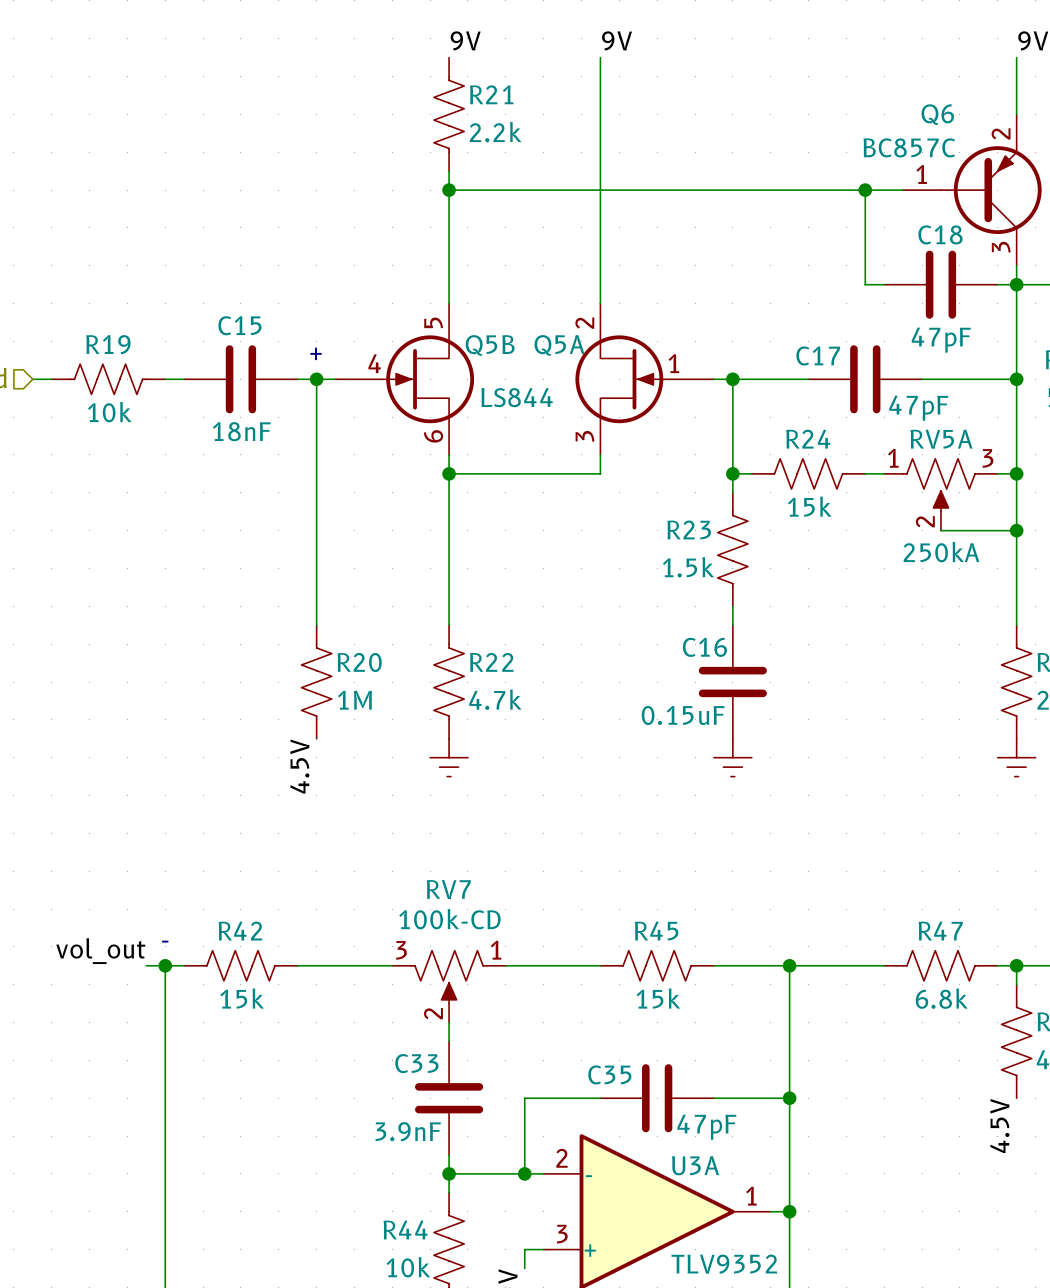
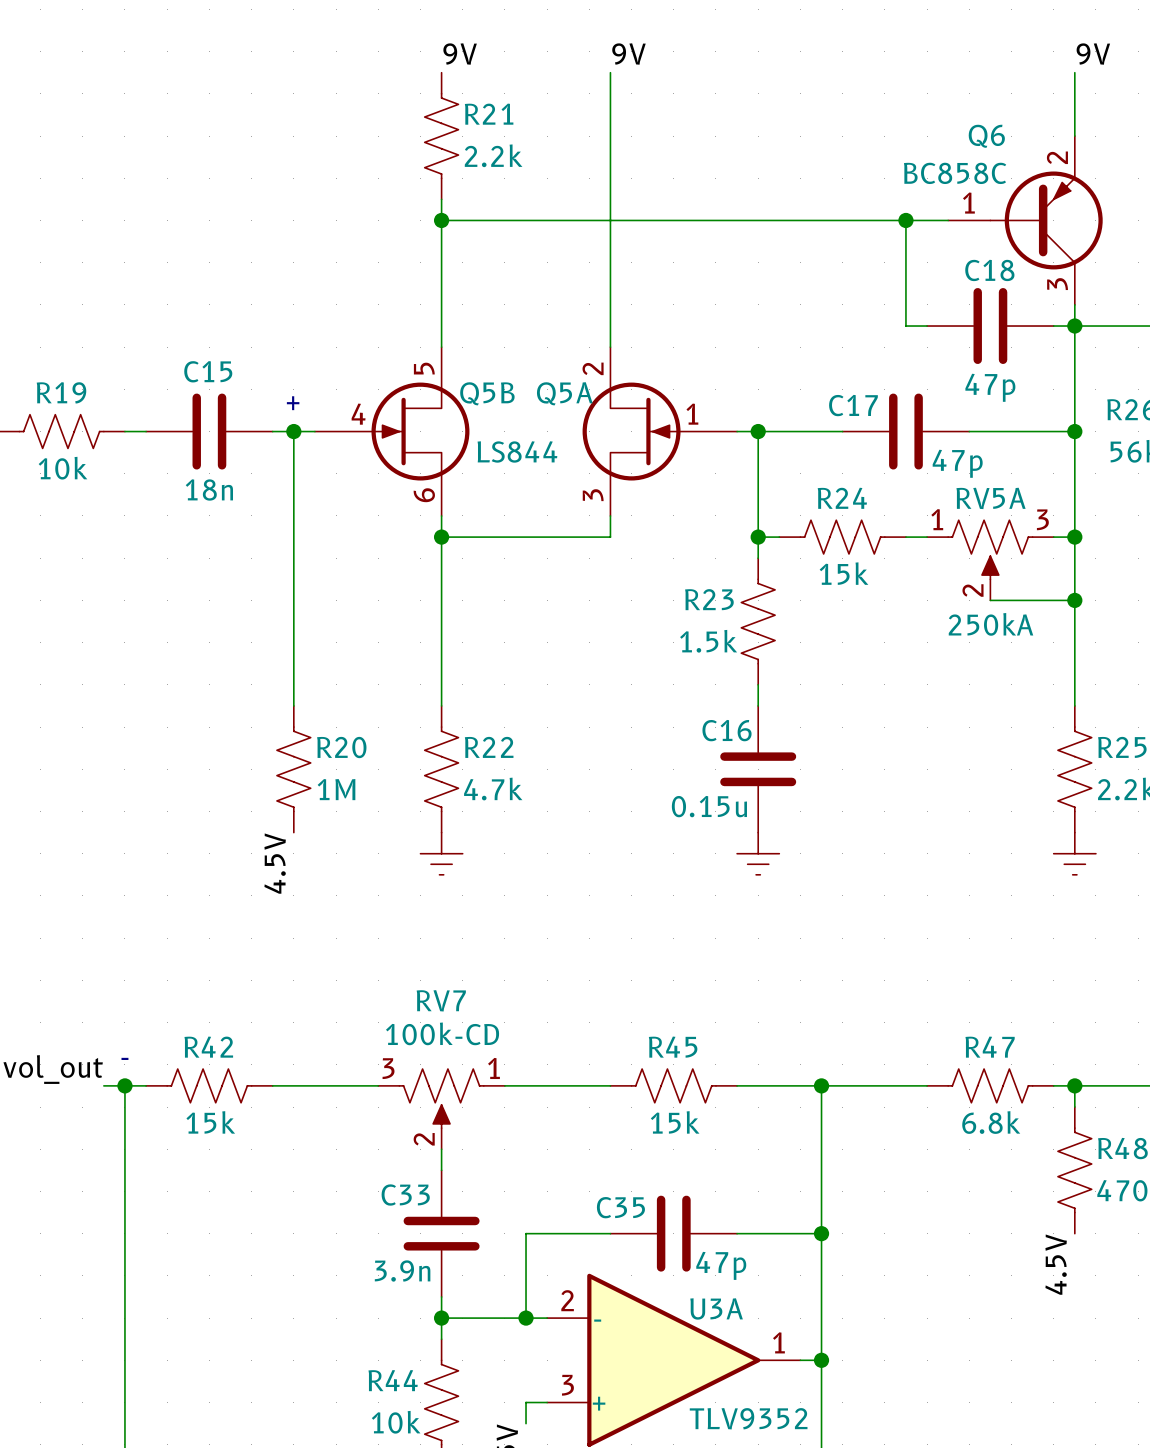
Q6 value: BC857C (909, 147) -> BC858C (955, 173)
C18 value: 47pF (941, 340) -> 47p (990, 387)
C17 value: 47pF (918, 408) -> 47p (957, 463)
C15 value: 18nF (241, 431) -> 18n (209, 489)
C16 value: 0.15uF (683, 715) -> 0.15u (709, 806)
C35 value: 47pF (706, 1127) -> 47p (721, 1265)
C33 value: 3.9nF (408, 1131) -> 3.9n (402, 1271)

